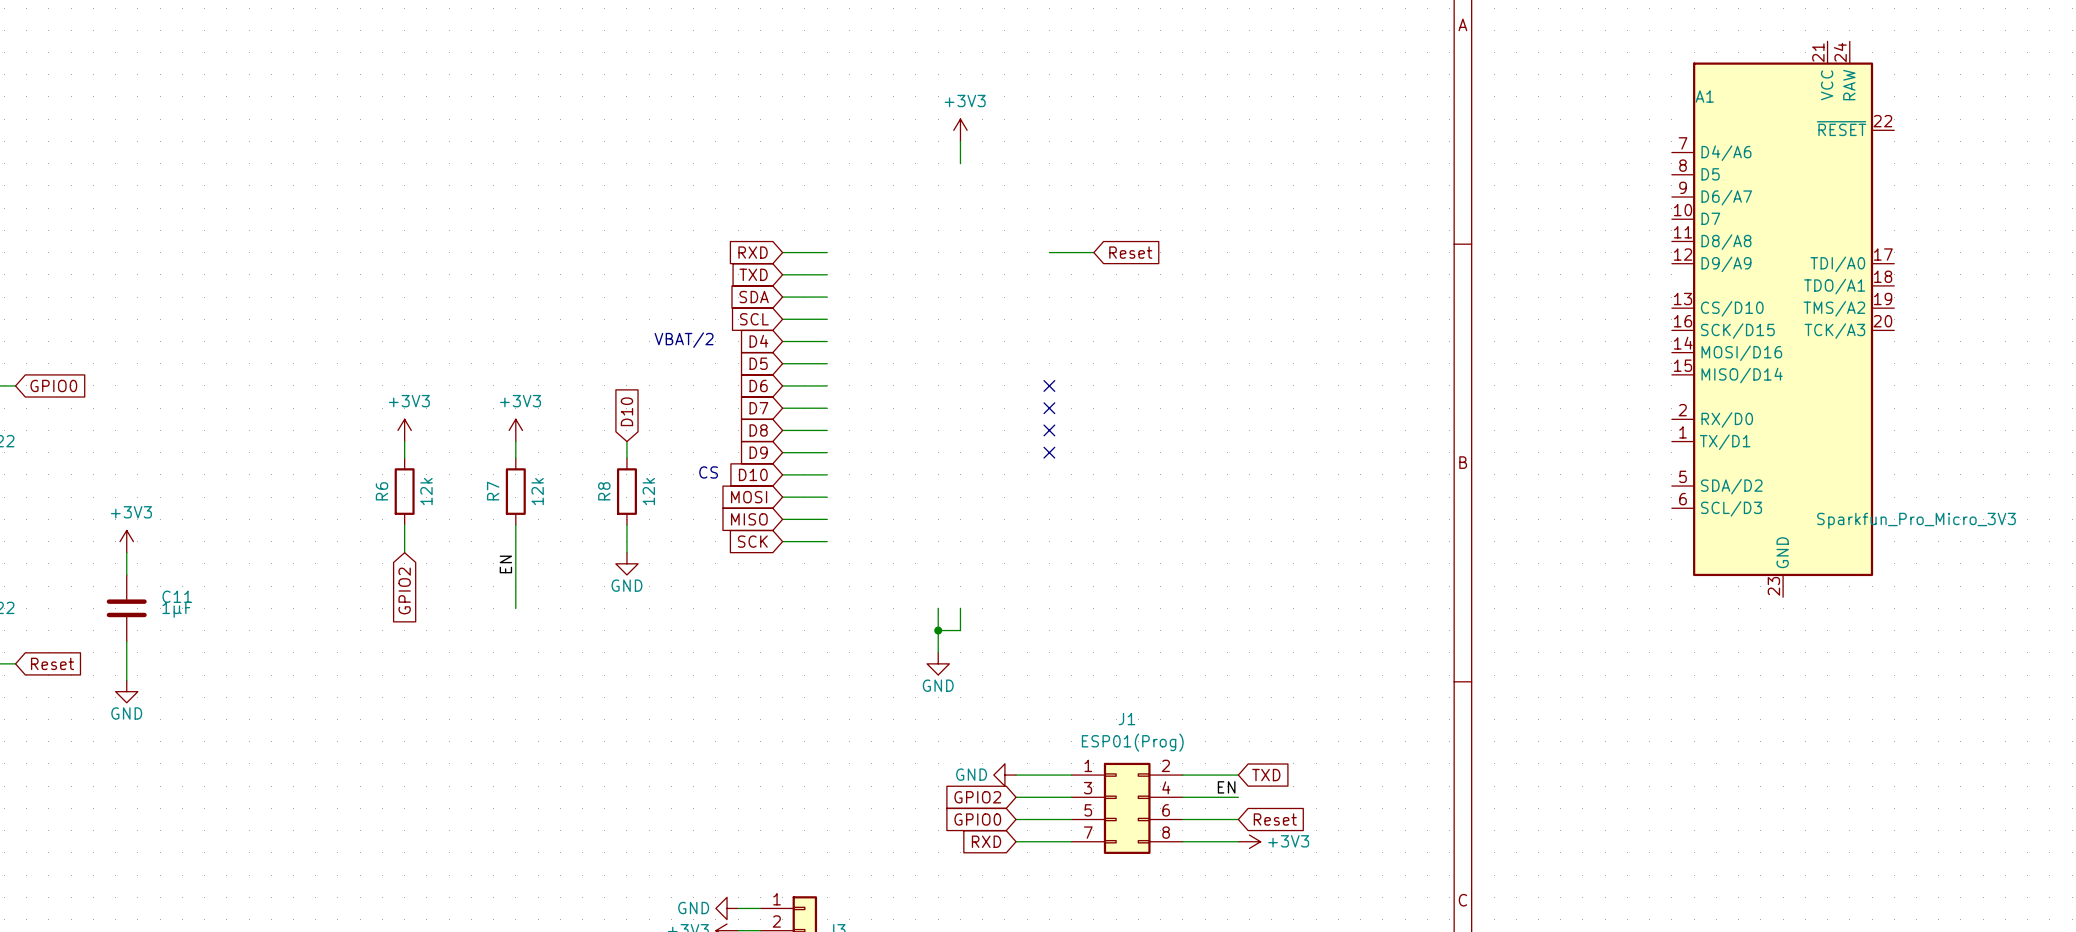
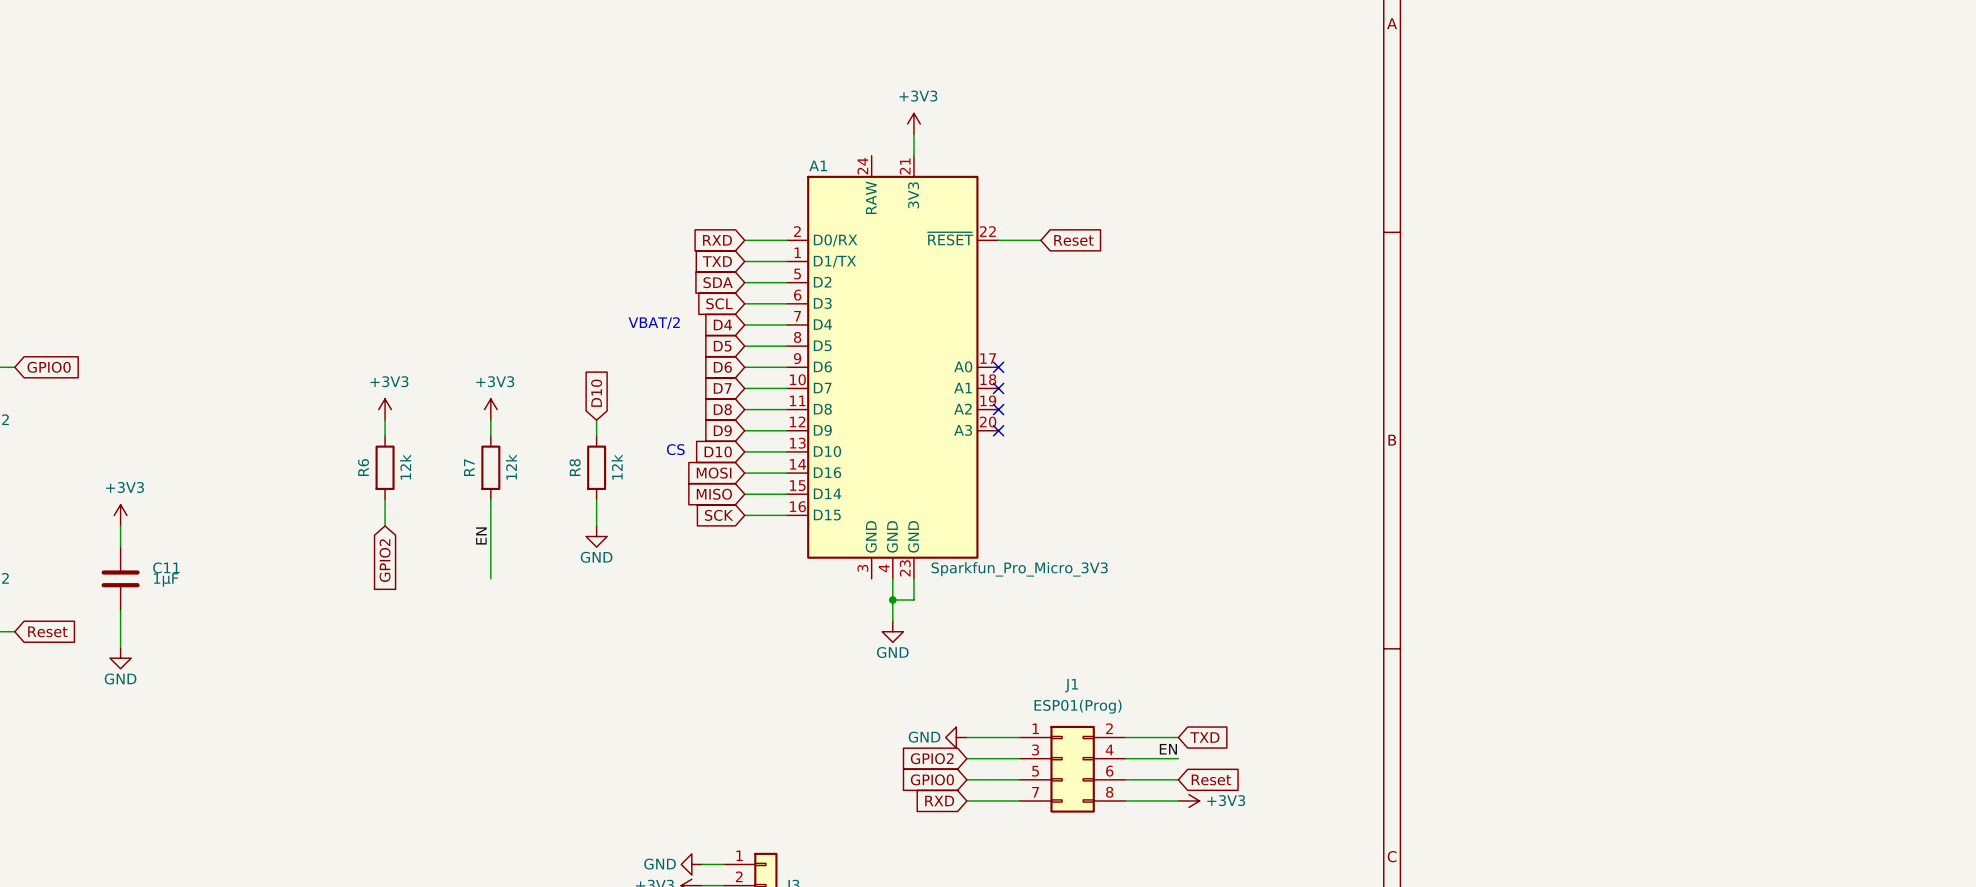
A1 symbol: [1671, 41, 1895, 598] -> [787, 155, 999, 579]

